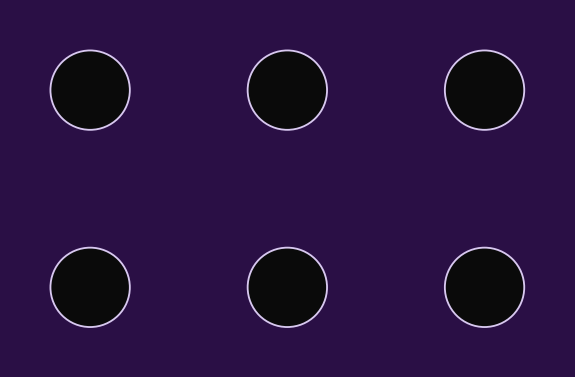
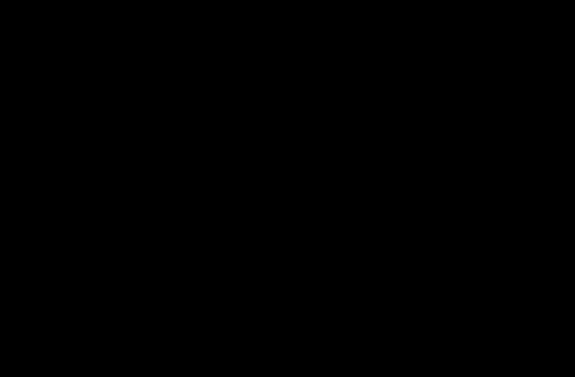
part: (90, 90) -> none
part: (287, 90) -> none
part: (484, 90) -> none
part: (90, 287) -> none
part: (287, 287) -> none
part: (484, 287) -> none

